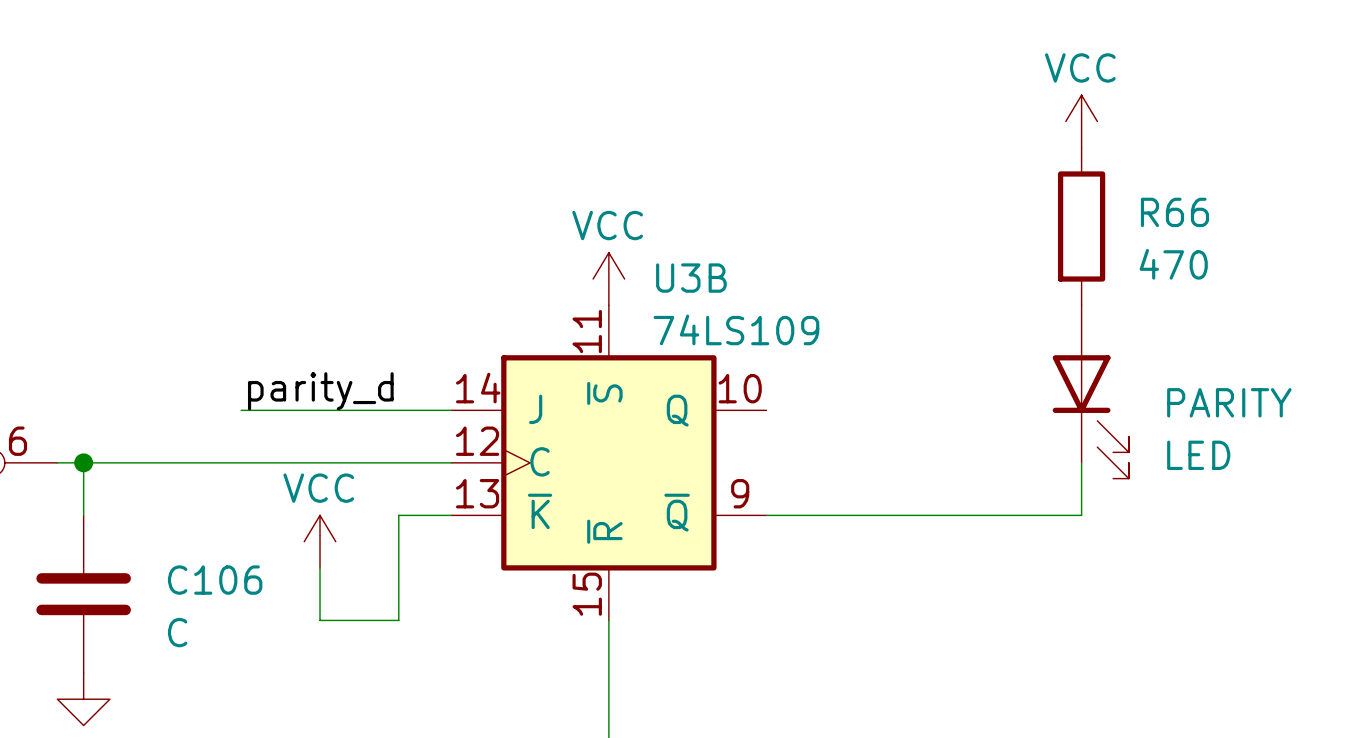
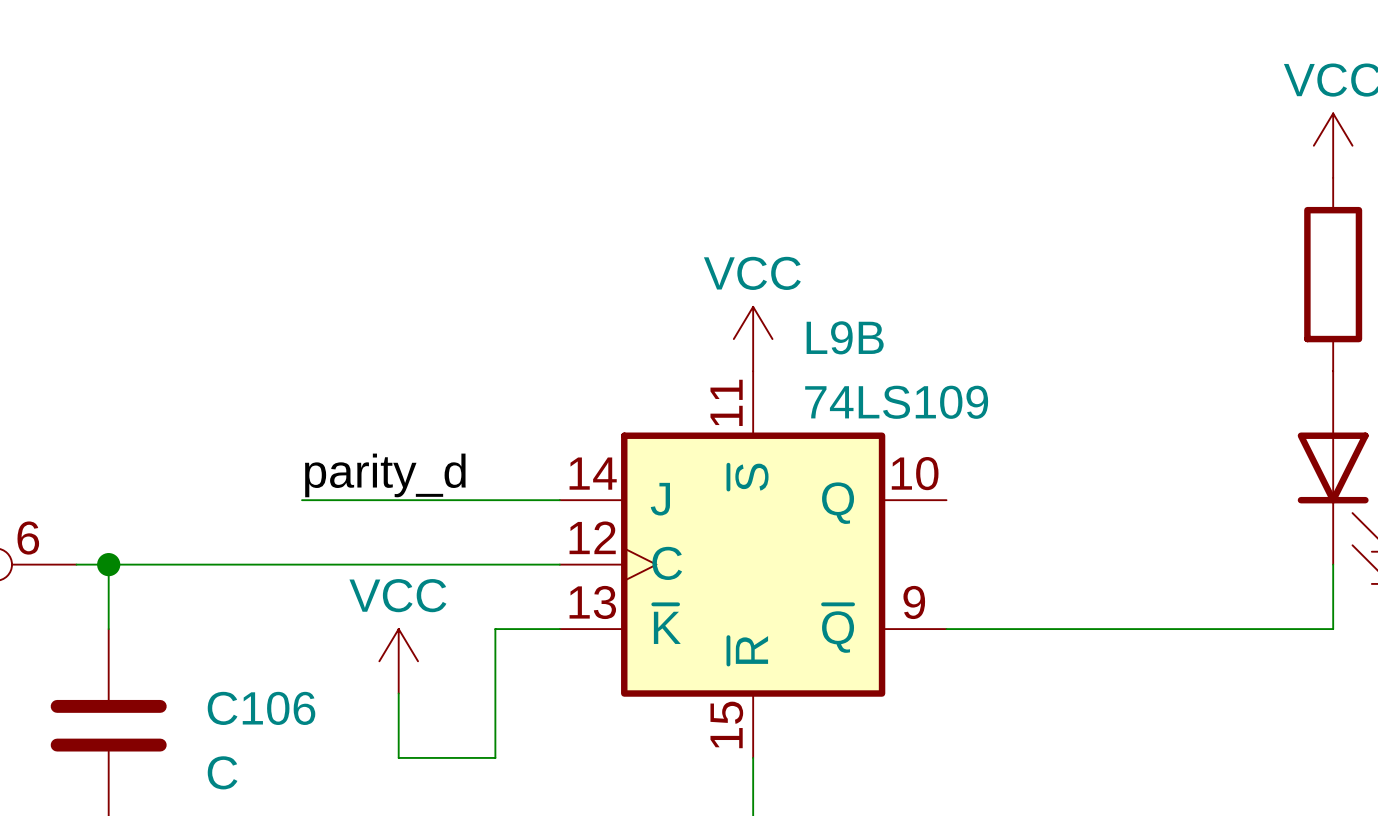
U3B name: U3B (691, 278) -> L9B (845, 337)

